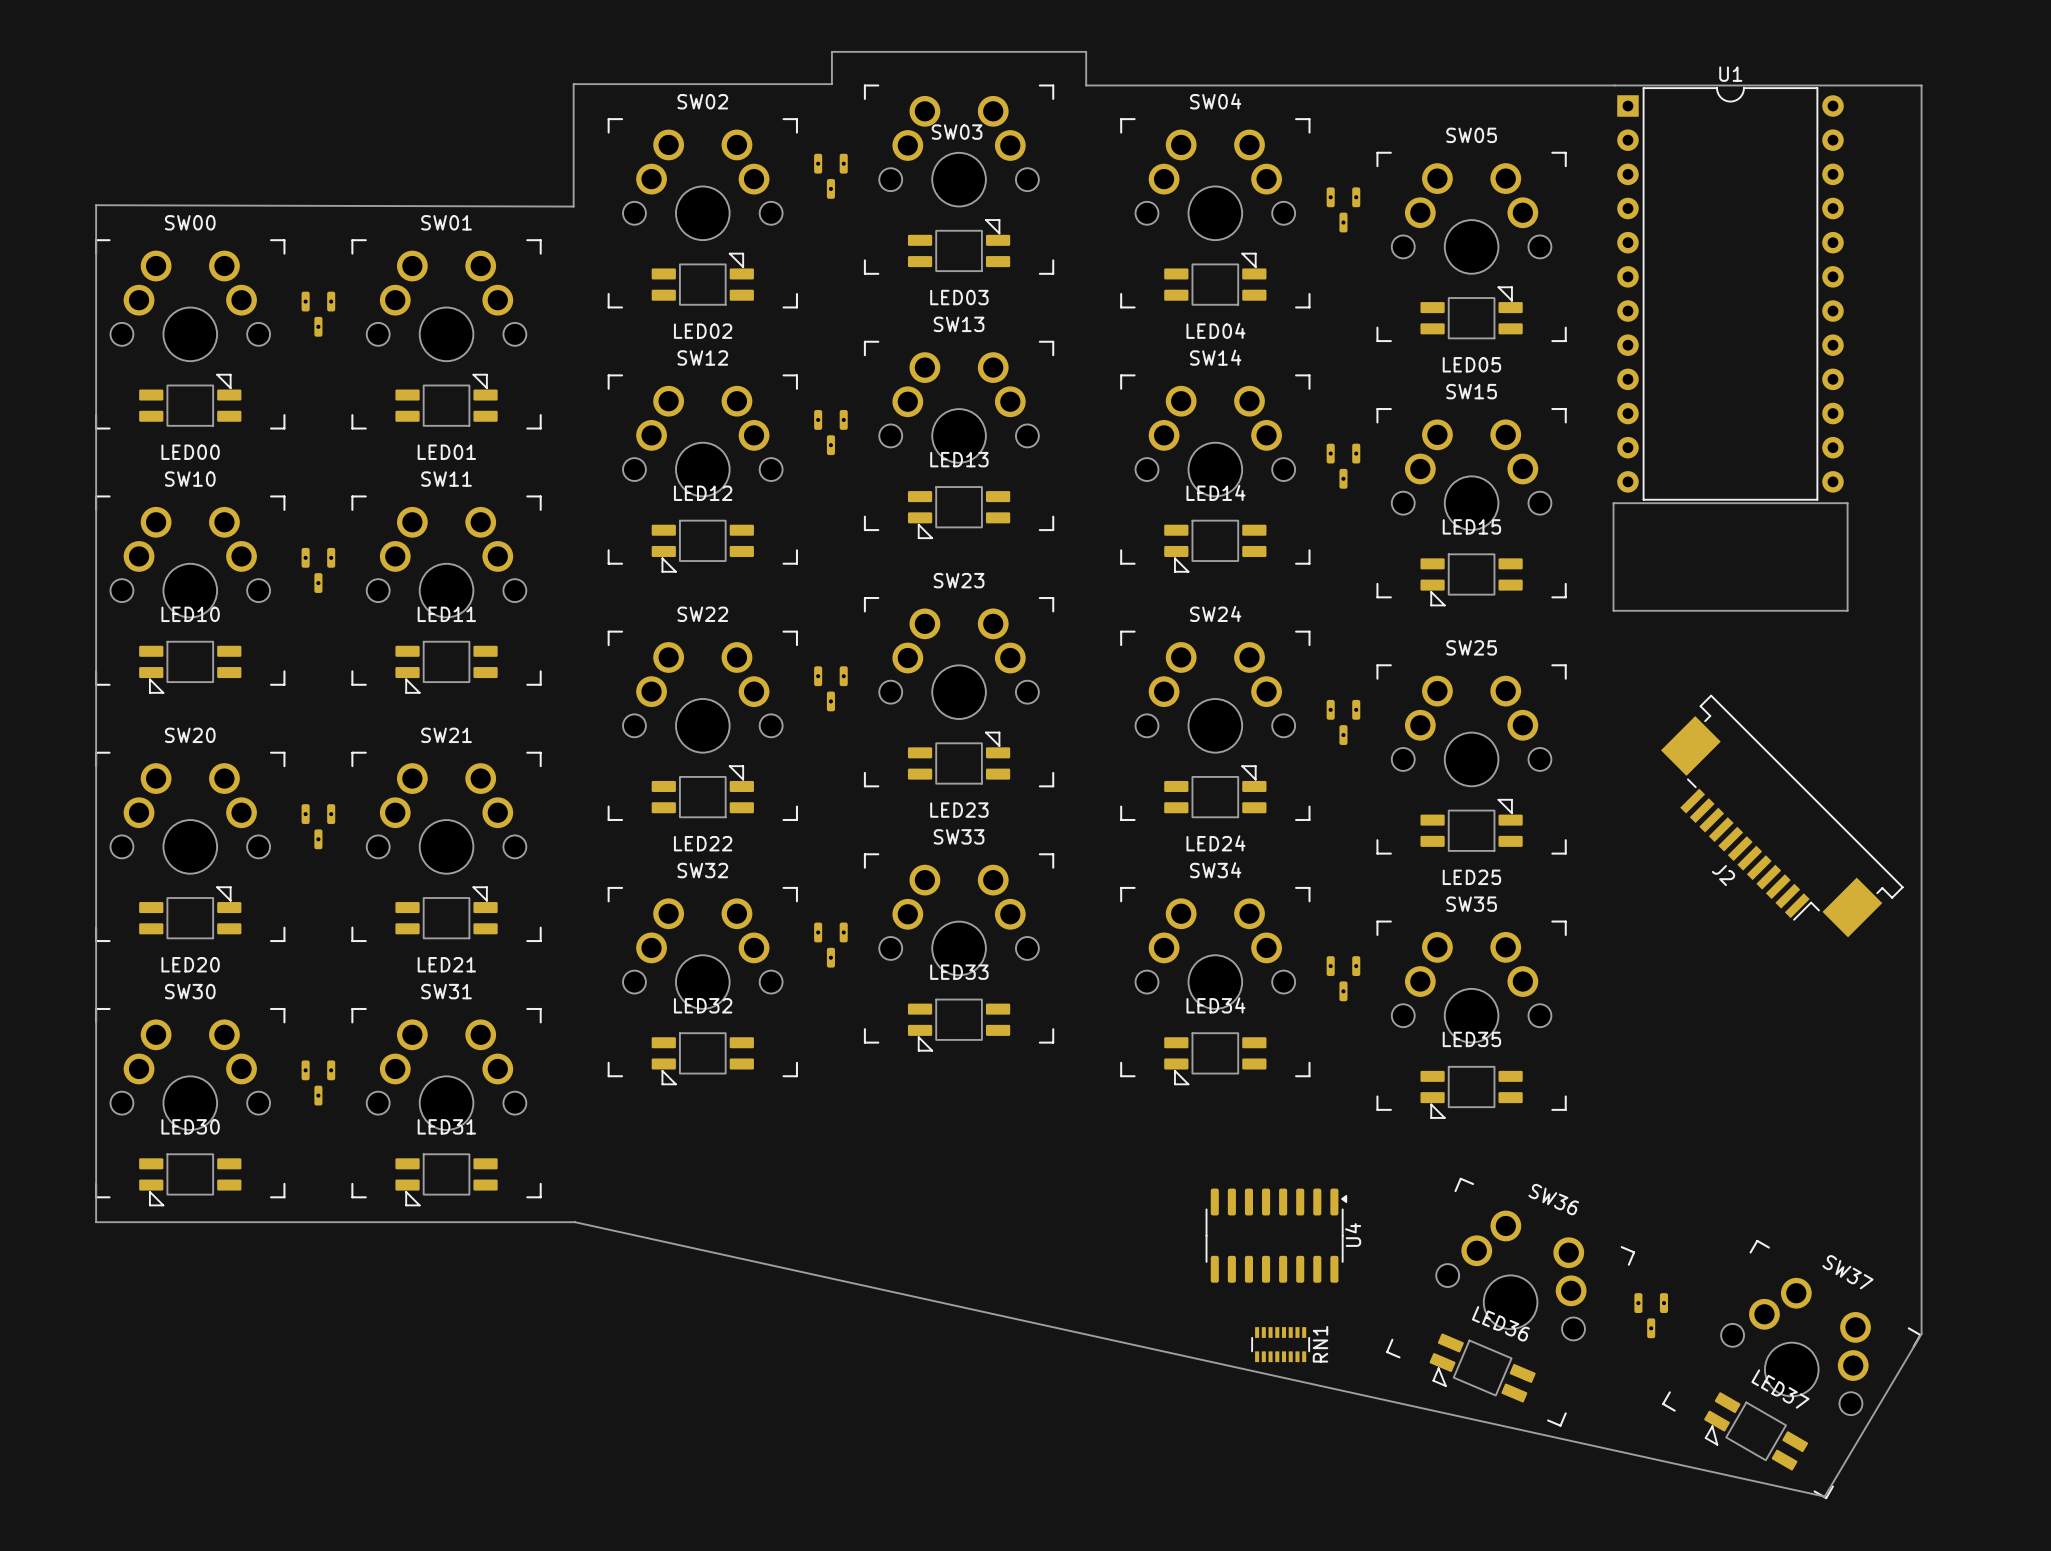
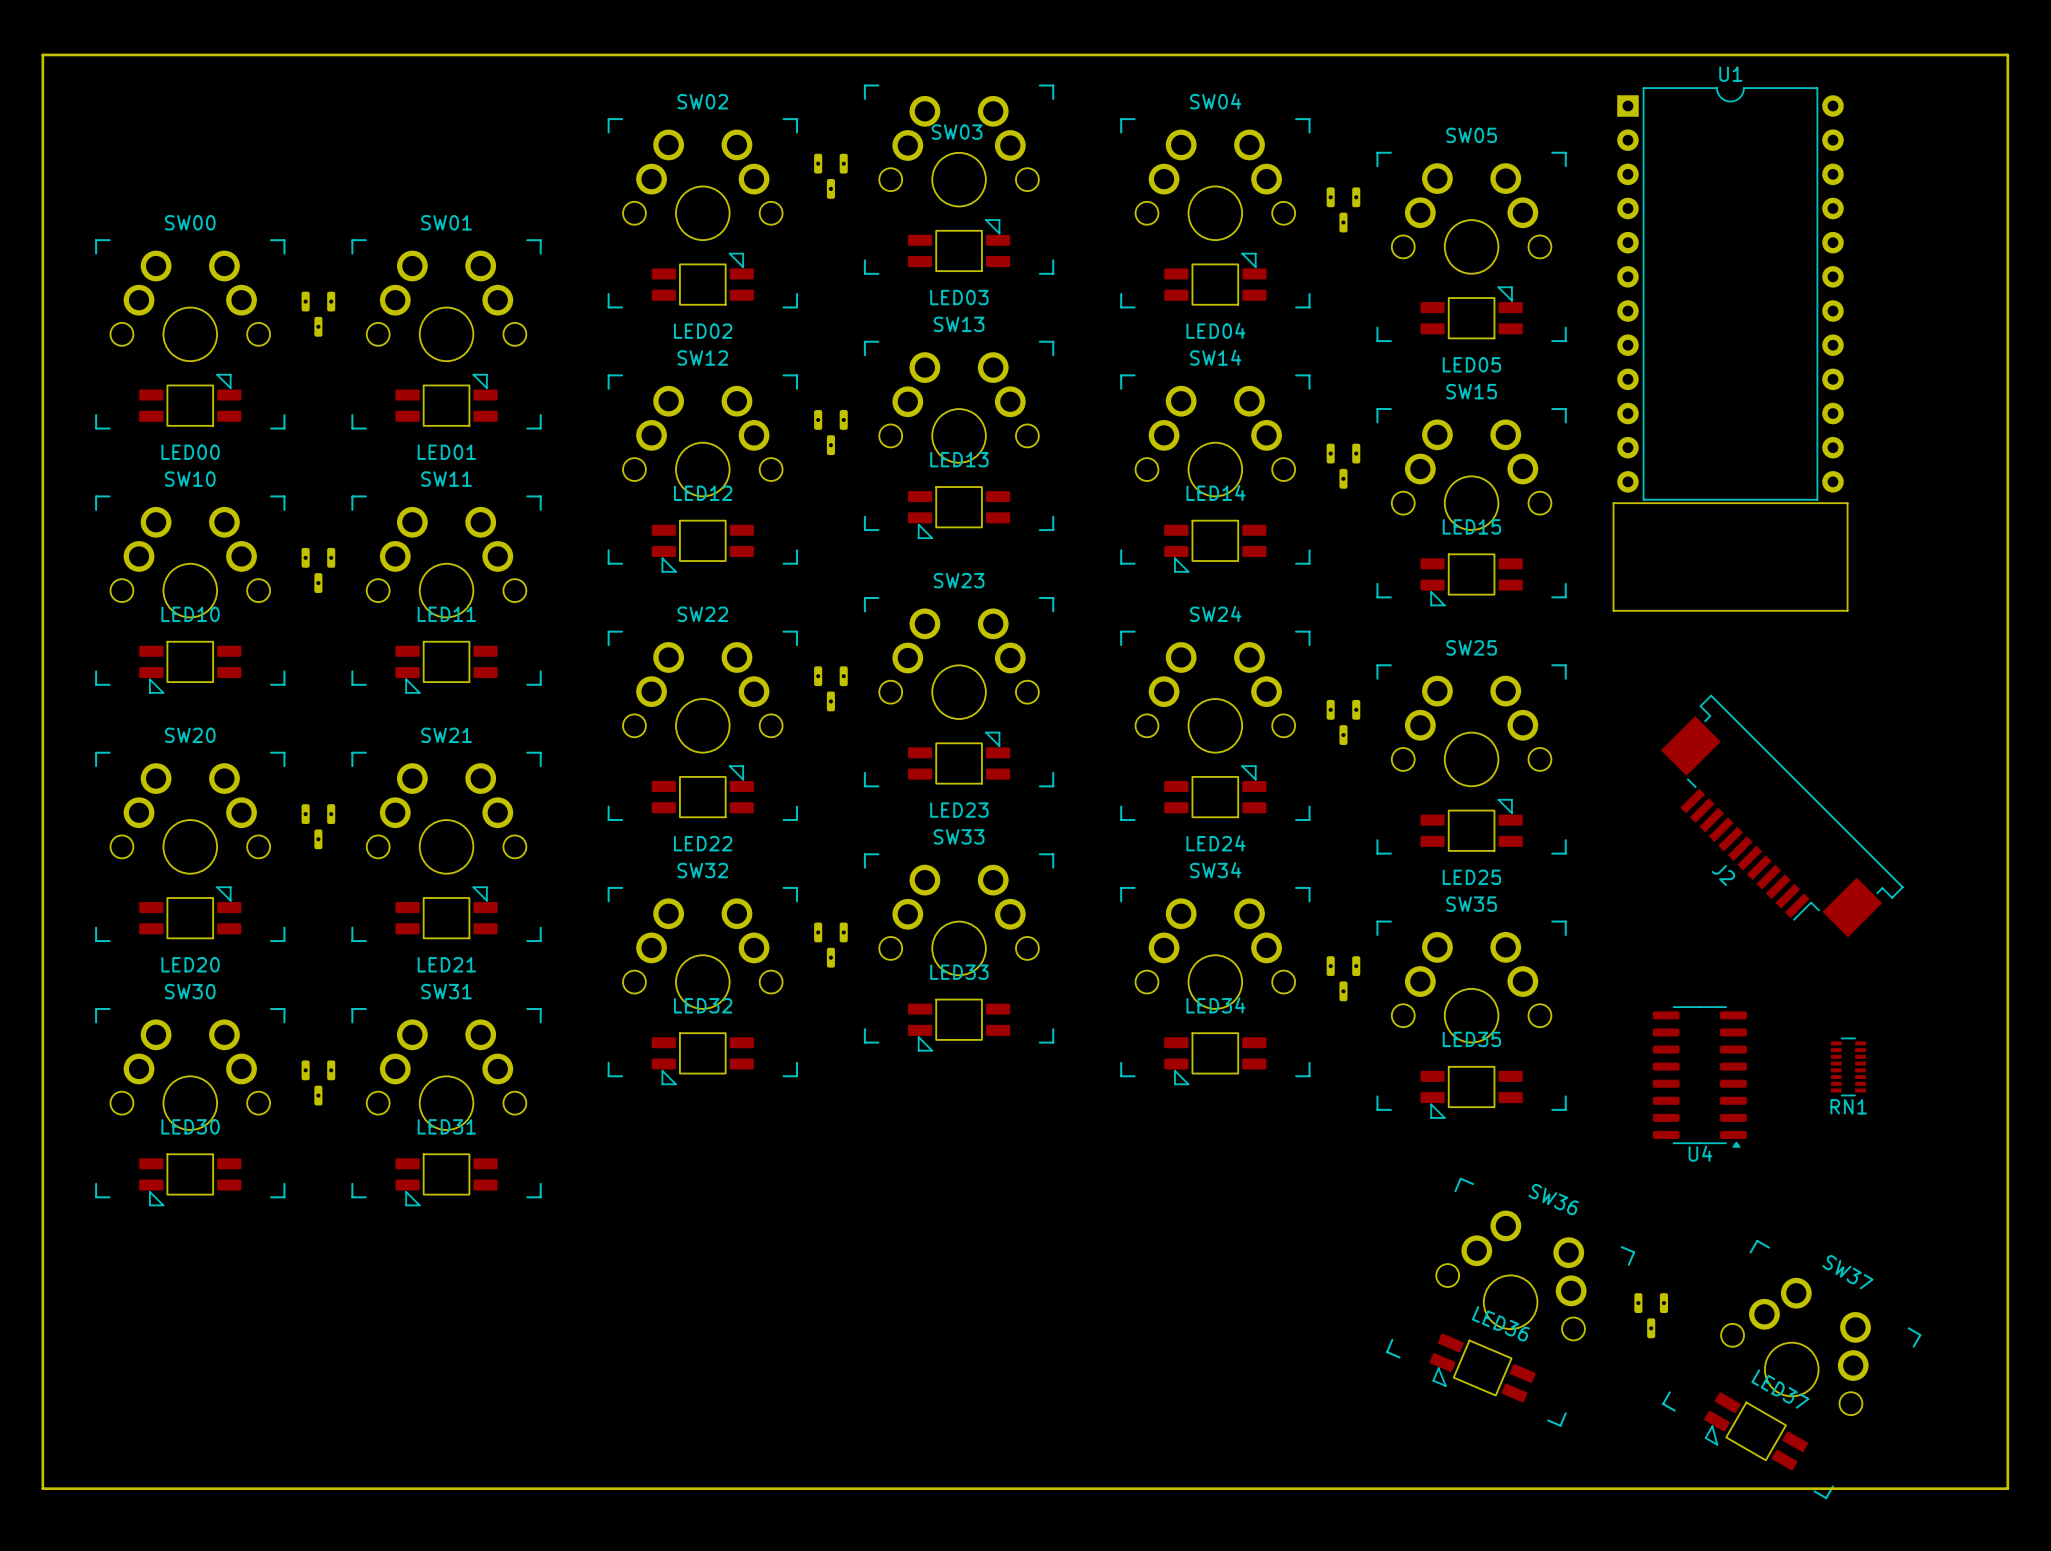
board edge: (831, 51) (831, 84) (573, 84) (573, 206) (96, 205) (96, 1222) (575, 1222) (1824, 1496) (1921, 1333) (1921, 85) (1086, 85) (1086, 51) (831, 51) -> (42, 54) (42, 1488) (2007, 1488) (2007, 54) (42, 54)
U4 rotation: 0° (1276, 1235) -> 90° clockwise (1699, 1077)
U4 position: (1276, 1235) -> (1699, 1077)
RN1 rotation: 0° (1280, 1344) -> 90° clockwise (1848, 1066)
RN1 position: (1280, 1344) -> (1848, 1066)

